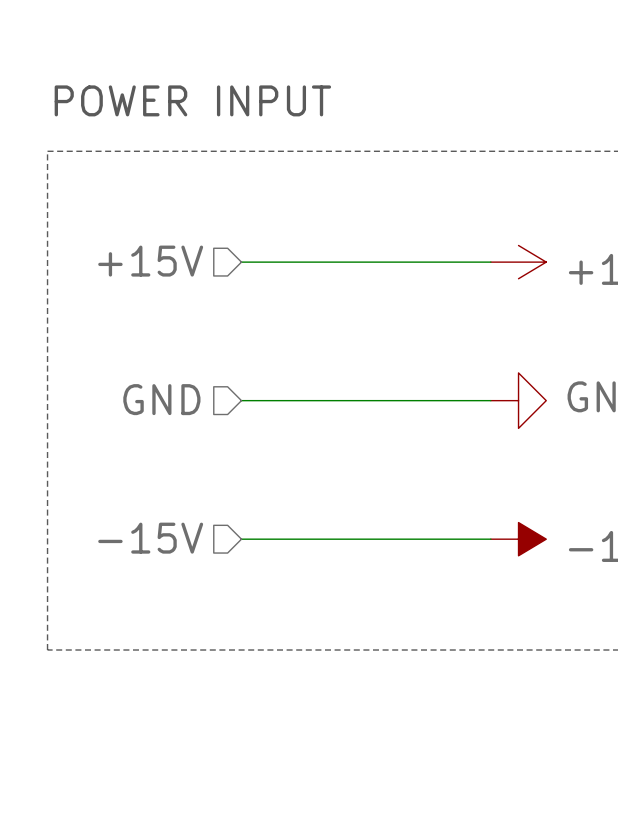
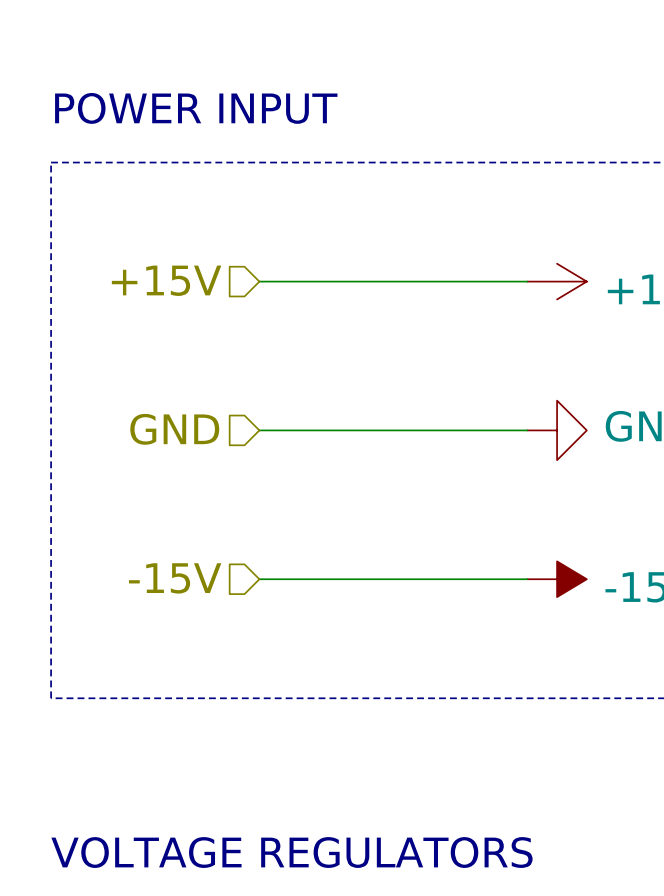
text: none -> VOLTAGE REGULATORS (291, 852)

